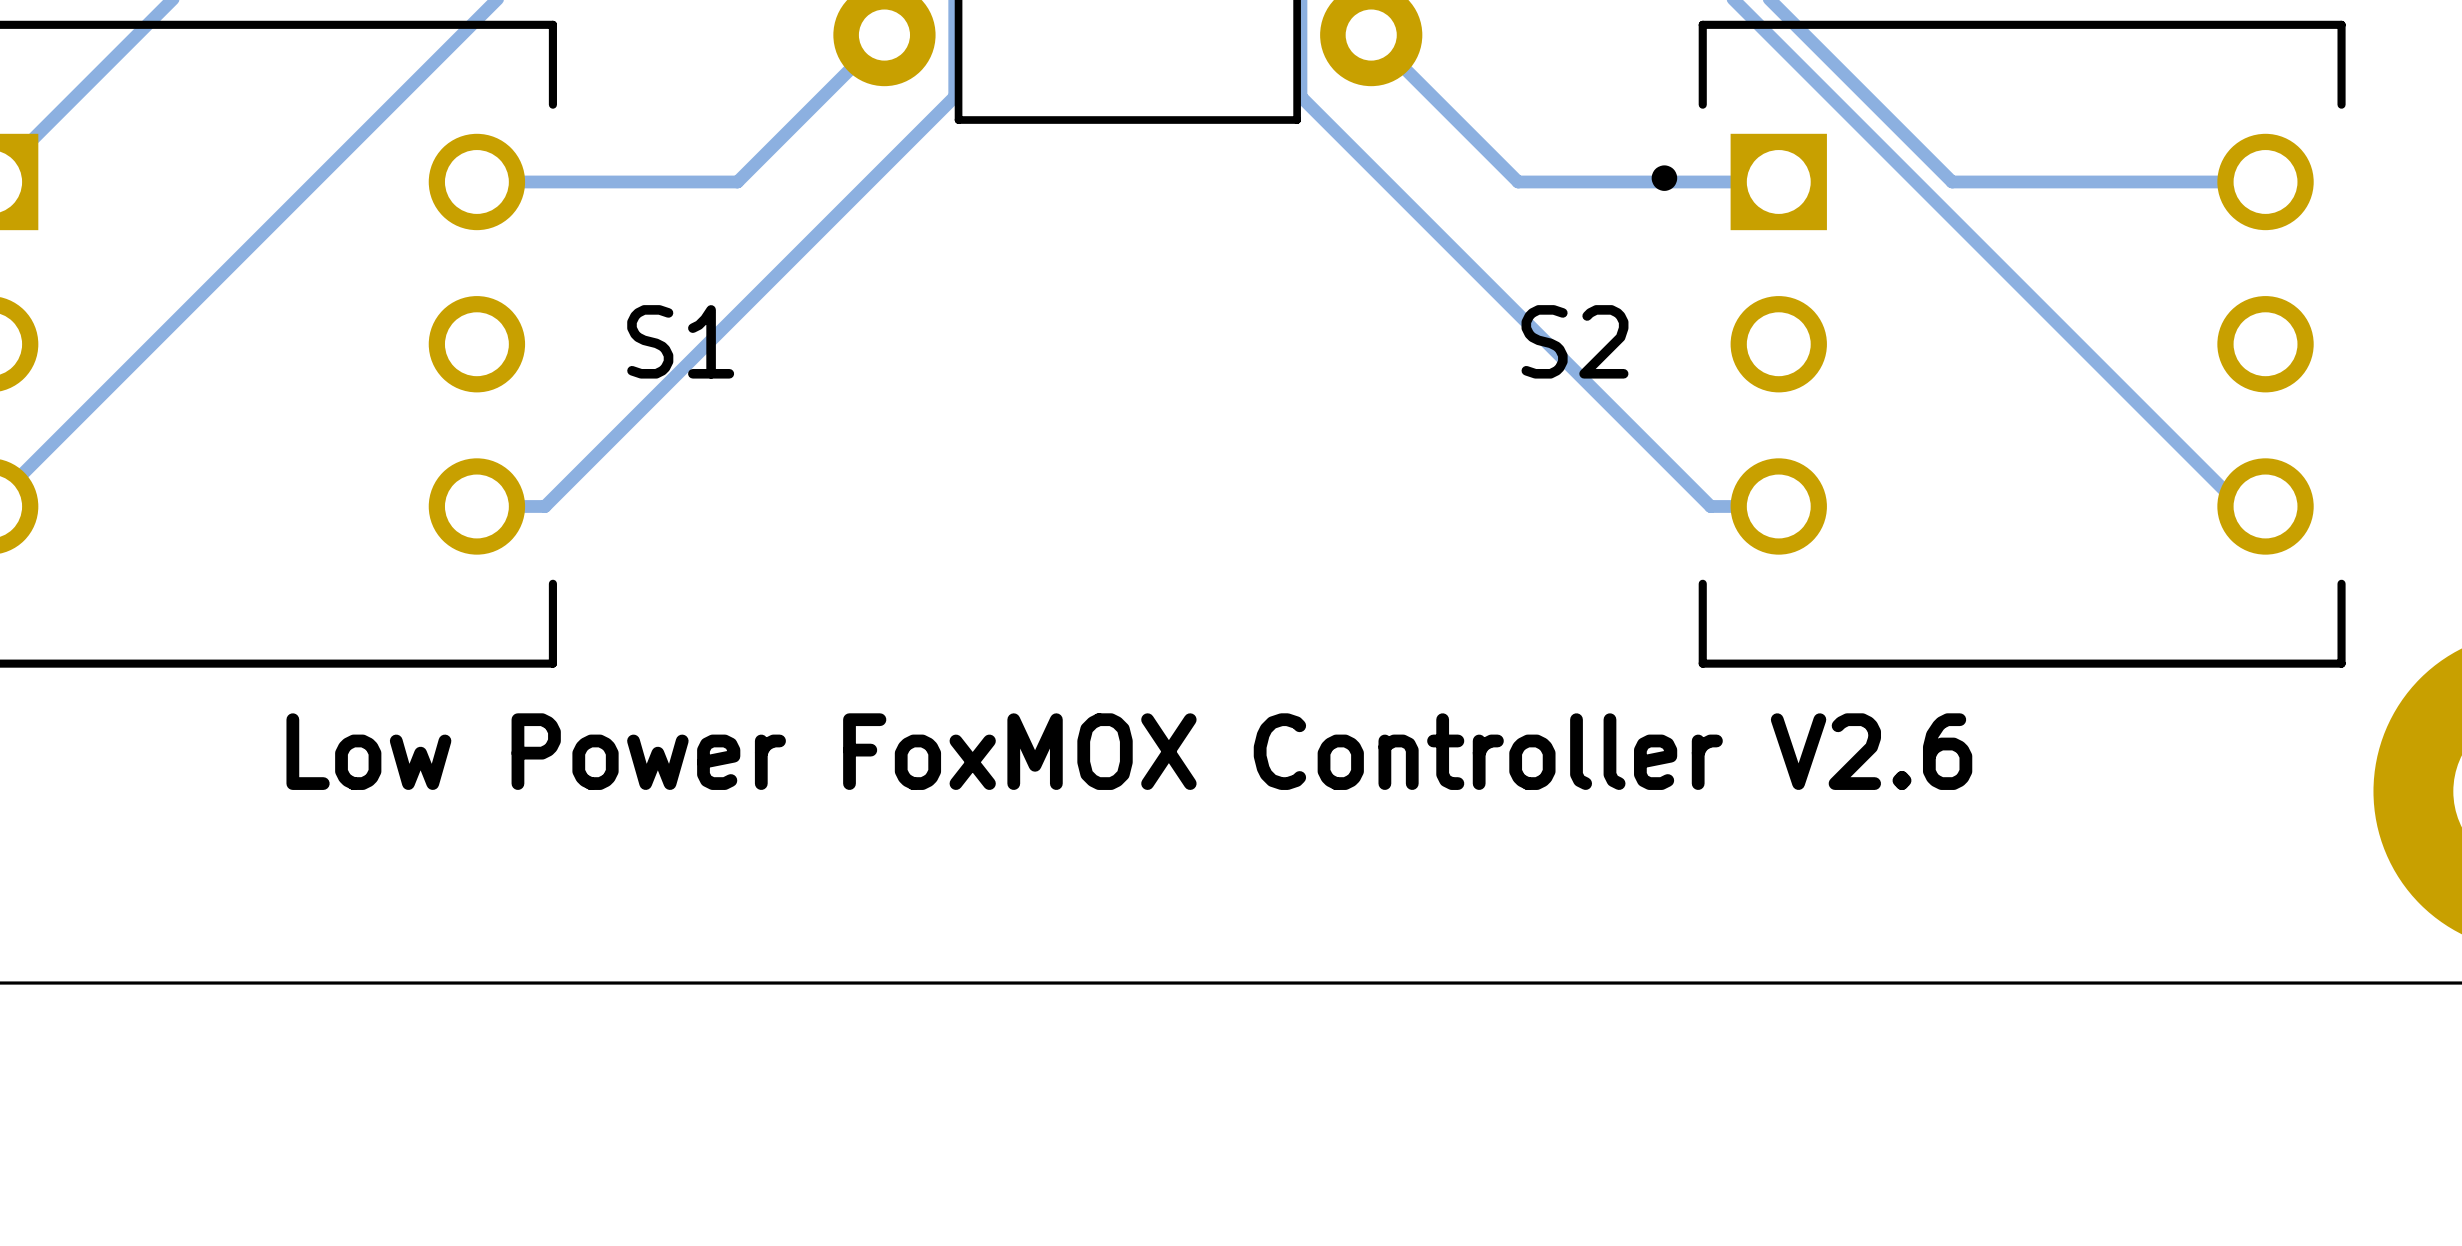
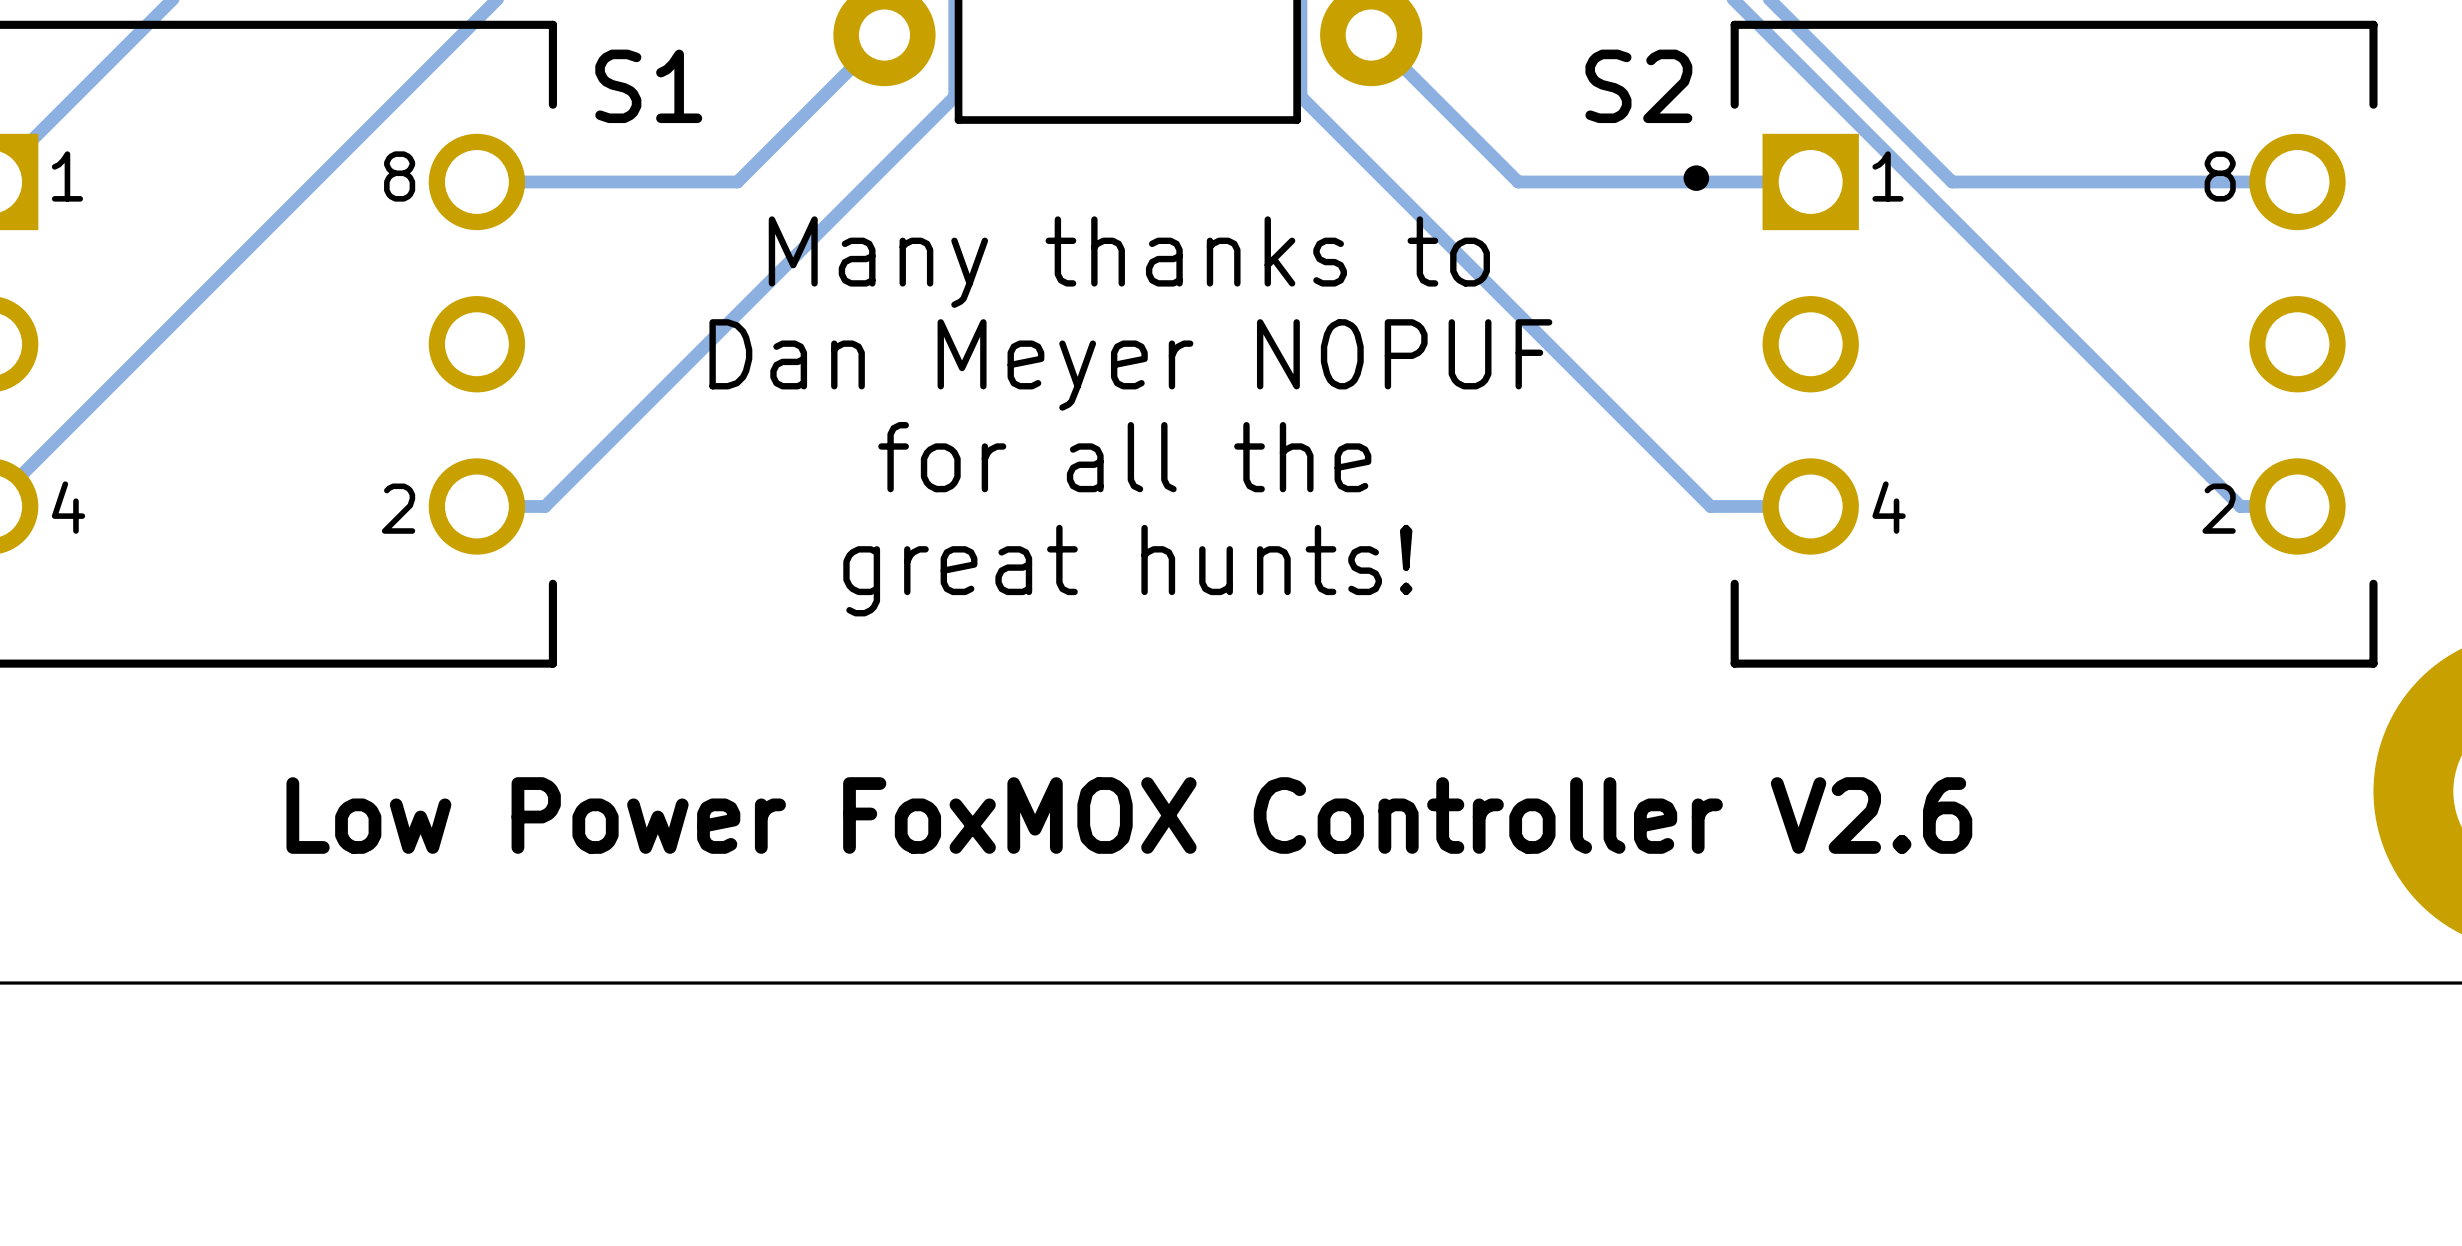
S1 text: none -> 1 (67, 176)
S1 text: none -> 8 (399, 176)
S2 text: none -> 1 (1888, 176)
S2 text: none -> 8 (2220, 176)
text: none -> Many thanks to (1129, 262)
S1 name position: S1 (680, 341) -> S1 (648, 86)
S2 name position: S2 (1574, 341) -> S2 (1638, 86)
S2 position: (1998, 344) -> (2030, 344)
text: none -> Dan Meyer N0PUF (1130, 364)
text: none -> for all the (1124, 457)
S1 text: none -> 4 (68, 507)
S2 text: none -> 4 (1889, 507)
S1 text: none -> 2 (398, 508)
S2 text: none -> 2 (2219, 508)
text: none -> great hunts! (1127, 570)
text position: Low Power FoxMOX Controller V2.6 (1129, 751) -> Low Power FoxMOX Controller V2.6 (1129, 815)

